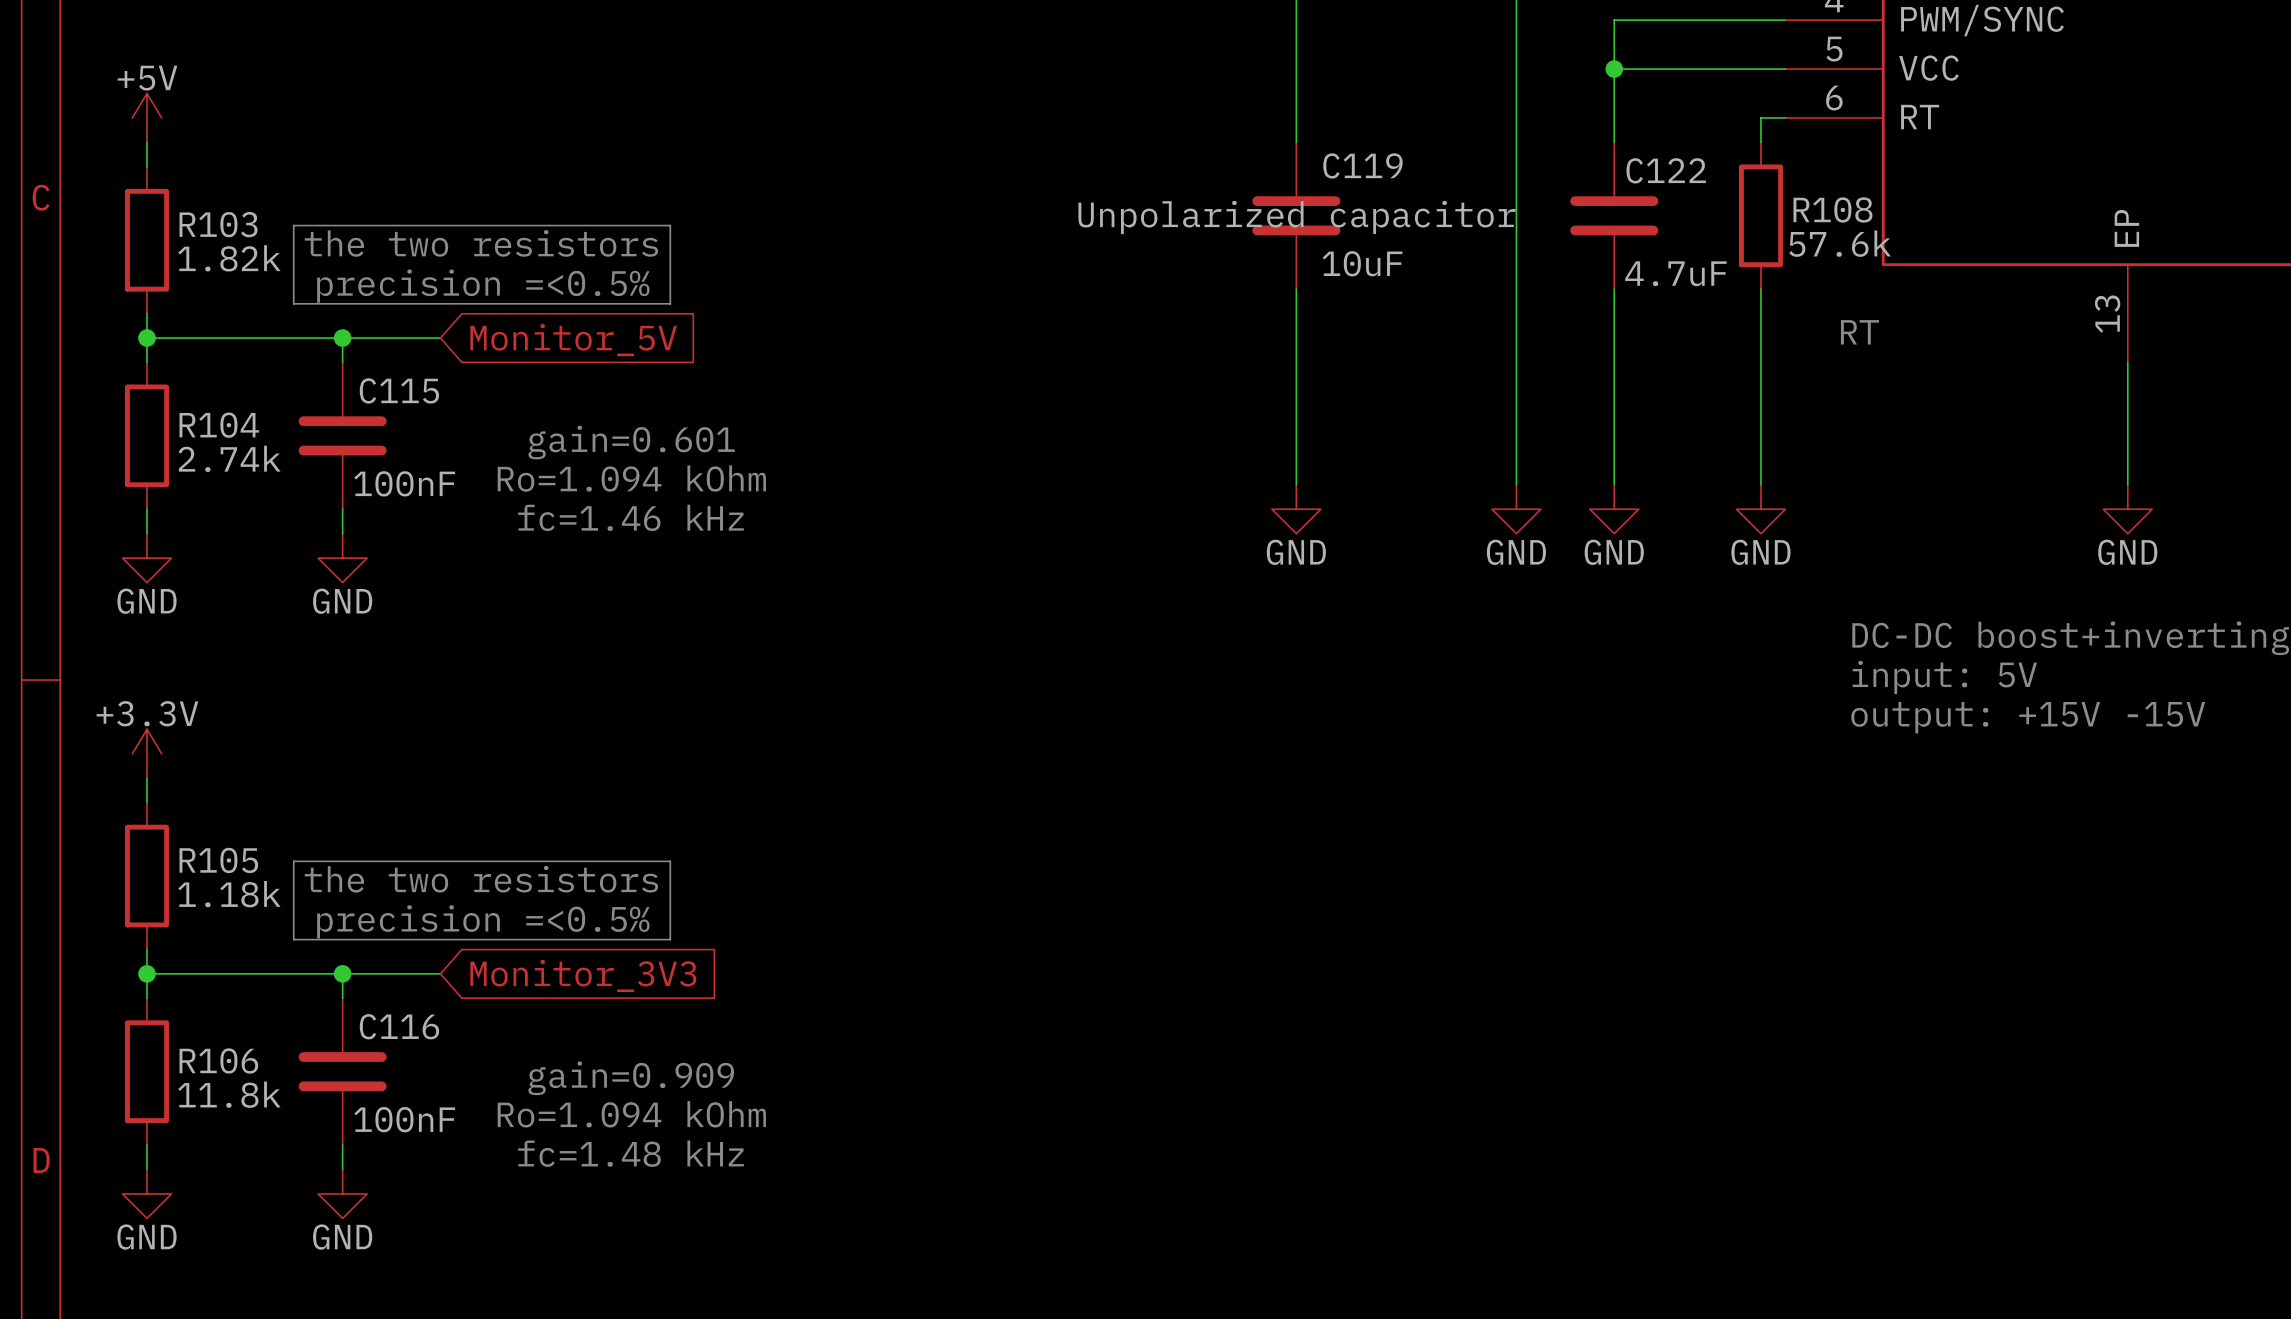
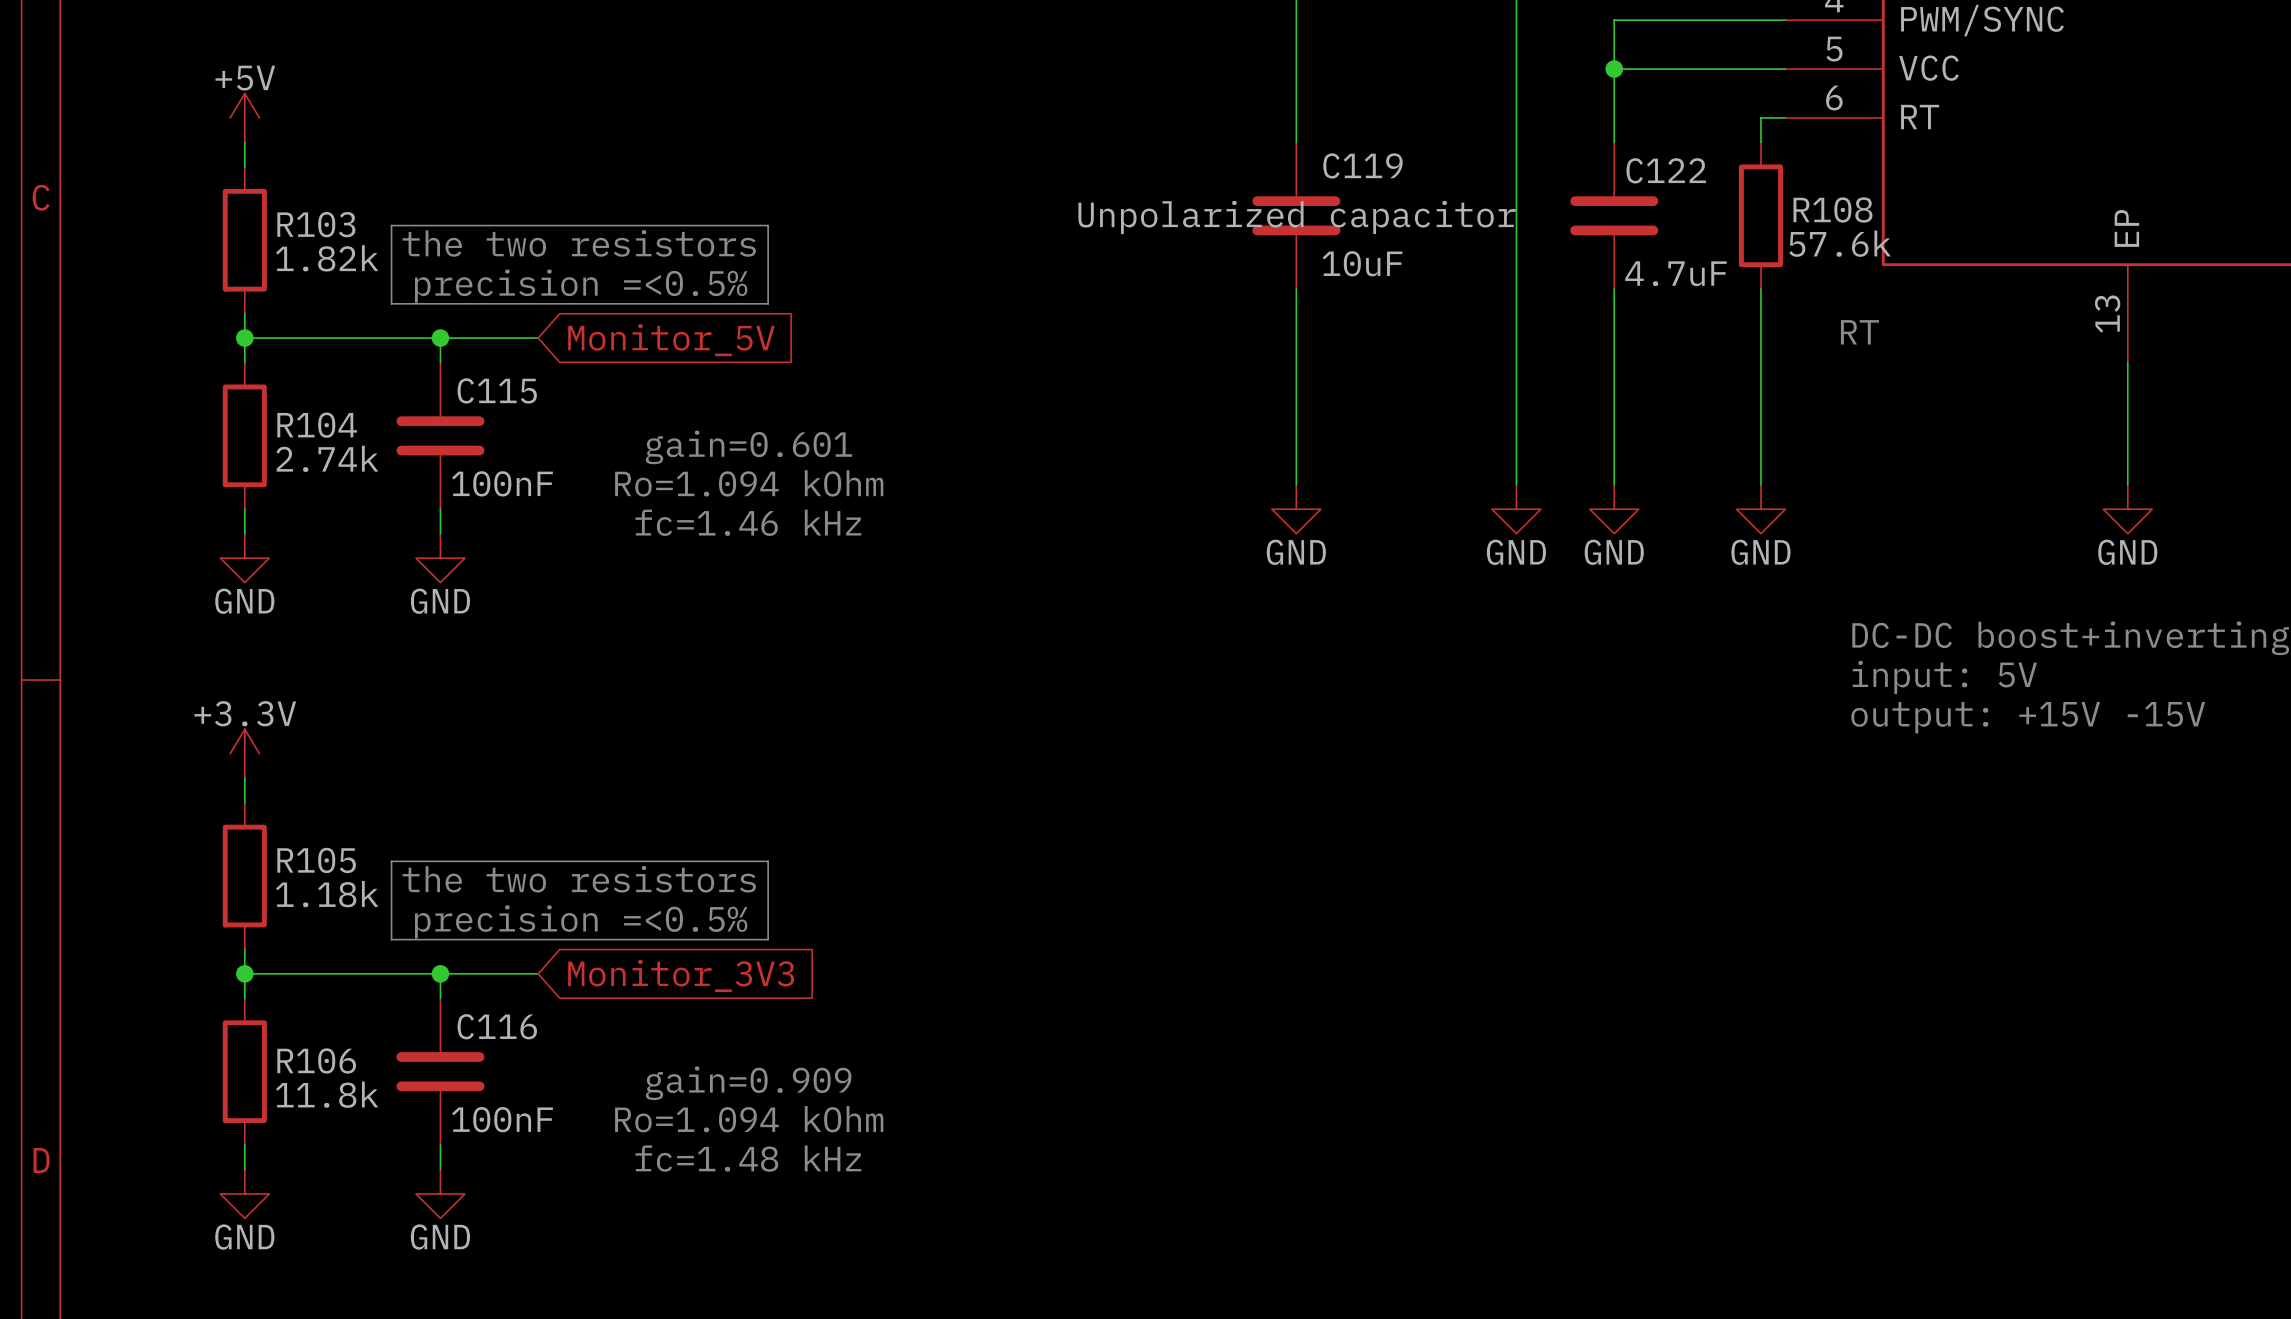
power symbol position: +5V (147, 117) -> +5V (244, 117)
wire: (147, 142) (147, 166) -> (244, 142) (244, 166)
line: (391, 225) (293, 225) (293, 303) (391, 303) -> (391, 225) (391, 303)
line: (670, 225) (670, 303) -> (670, 225) (768, 225) (768, 303) (670, 303)
R103 position: (147, 240) -> (244, 240)
text position: the two resistors (481, 243) -> the two resistors (579, 243)
text position: precision =<0.5% (483, 286) -> precision =<0.5% (581, 286)
wire: (147, 313) (147, 362) -> (244, 313) (244, 362)
wire: (147, 338) (244, 338) -> none
junction: (147, 338) -> none
junction: none -> (244, 338)
wire: (342, 338) (342, 362) -> none
junction: (342, 338) -> none
junction: none -> (440, 338)
wire: none -> (538, 338) (440, 338) (440, 362)
global label position: Monitor_5V (573, 340) -> Monitor_5V (671, 340)
R104 position: (147, 435) -> (244, 435)
C115 position: (342, 435) -> (440, 435)
text position: gain=0.601 (631, 442) -> gain=0.601 (748, 447)
text position: Ro=1.094 kOhm (631, 478) -> Ro=1.094 kOhm (749, 483)
wire: (147, 509) (147, 533) -> (244, 509) (244, 533)
wire: (342, 509) (342, 533) -> (440, 509) (440, 533)
text position: fc=1.46 kHz (630, 517) -> fc=1.46 kHz (748, 522)
power symbol: GND (147, 558) -> none
power symbol: none -> GND (244, 558)
power symbol: GND (342, 558) -> none
power symbol: none -> GND (440, 558)
power symbol position: +3.3V (147, 753) -> +3.3V (244, 753)
wire: (147, 778) (147, 802) -> (244, 778) (244, 802)
line: (391, 861) (293, 861) (293, 939) (391, 939) -> (391, 861) (391, 939)
line: (670, 861) (670, 939) -> (670, 861) (768, 861) (768, 939) (670, 939)
R105 position: (147, 876) -> (244, 876)
text position: the two resistors (481, 879) -> the two resistors (579, 879)
text position: precision =<0.5% (483, 921) -> precision =<0.5% (581, 921)
wire: (147, 949) (147, 998) -> (244, 949) (244, 998)
wire: (147, 973) (244, 973) -> none
junction: (147, 973) -> none
junction: none -> (244, 973)
wire: (342, 973) (342, 998) -> none
junction: (342, 973) -> none
junction: none -> (440, 973)
wire: none -> (538, 973) (440, 973) (440, 998)
global label position: Monitor_3V3 (583, 975) -> Monitor_3V3 (681, 975)
R106 position: (147, 1071) -> (244, 1071)
C116 position: (342, 1071) -> (440, 1071)
text position: gain=0.909 (631, 1078) -> gain=0.909 (748, 1083)
text position: Ro=1.094 kOhm (631, 1114) -> Ro=1.094 kOhm (749, 1119)
wire: (147, 1145) (147, 1169) -> (244, 1145) (244, 1169)
wire: (342, 1145) (342, 1169) -> (440, 1145) (440, 1169)
text position: fc=1.48 kHz (630, 1153) -> fc=1.48 kHz (748, 1158)
power symbol: GND (147, 1193) -> none
power symbol: none -> GND (244, 1193)
power symbol: GND (342, 1193) -> none
power symbol: none -> GND (440, 1193)

